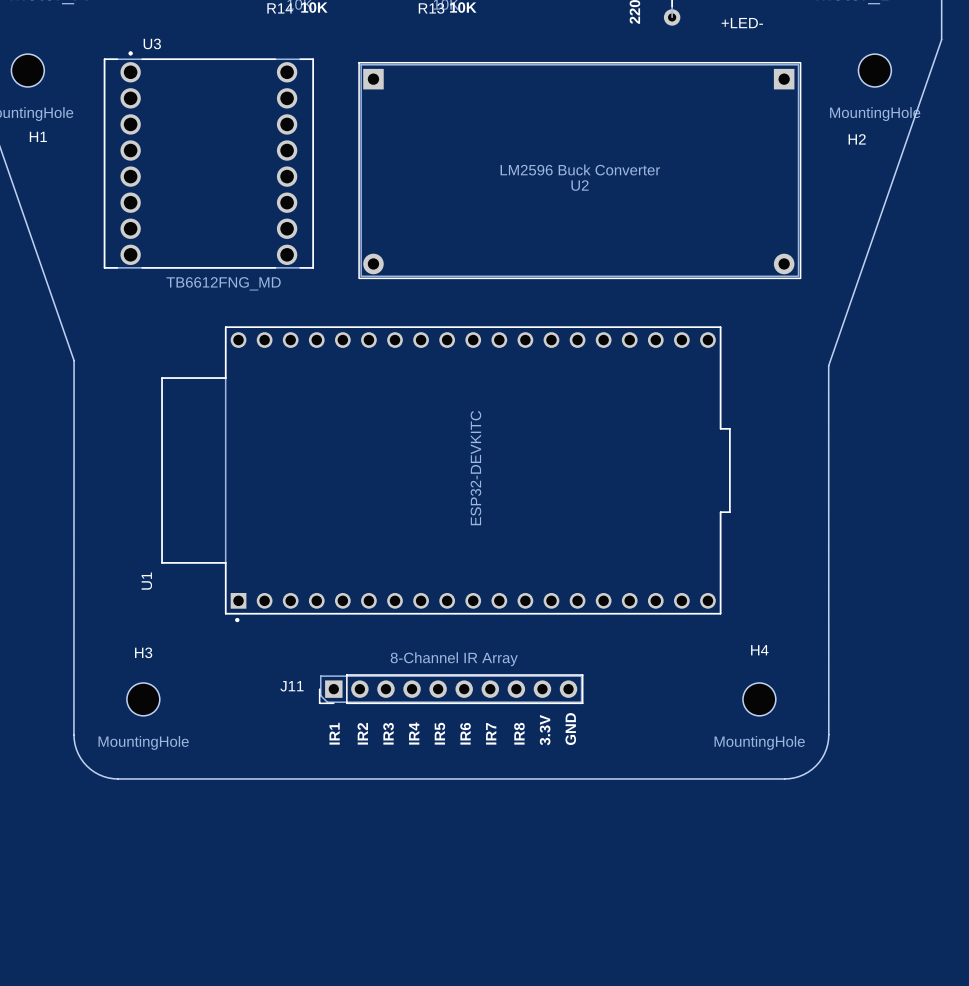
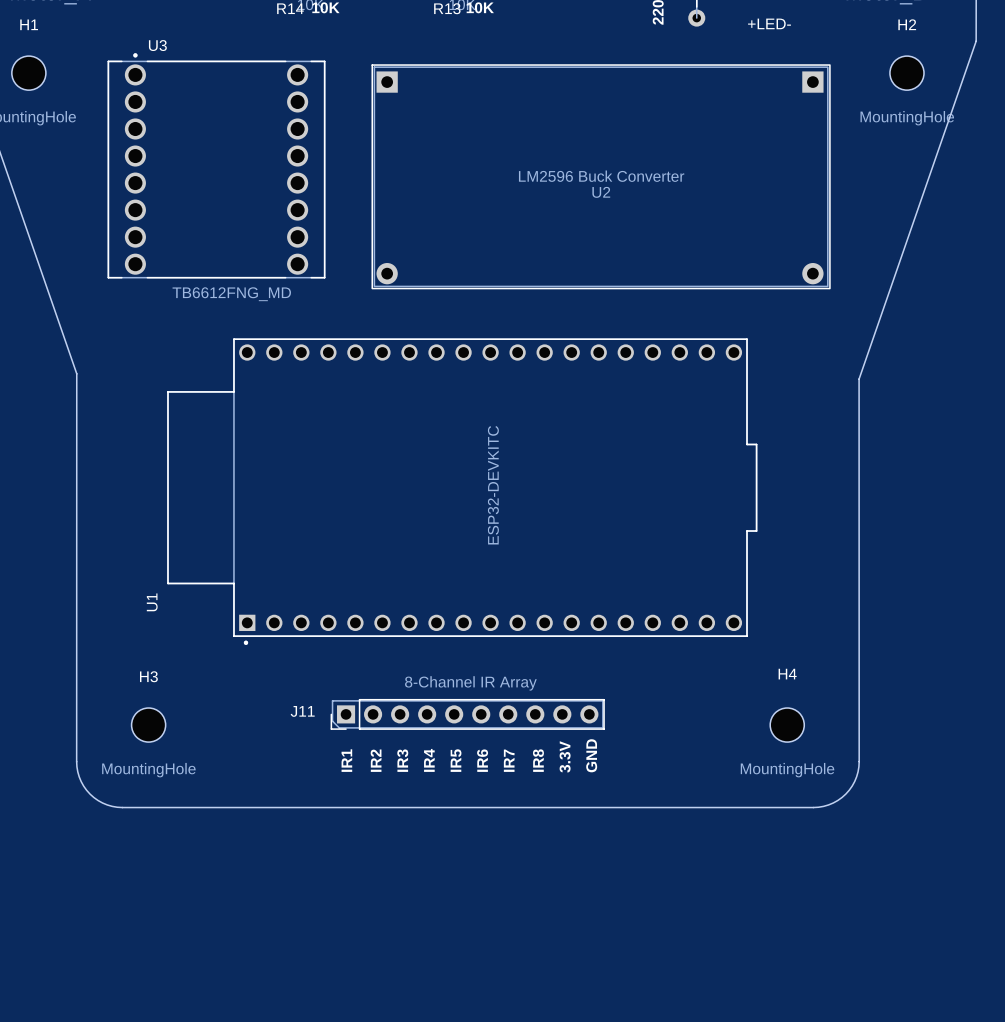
H1 name position: H1 (38, 136) -> H1 (29, 24)
H2 name position: H2 (857, 139) -> H2 (907, 24)

